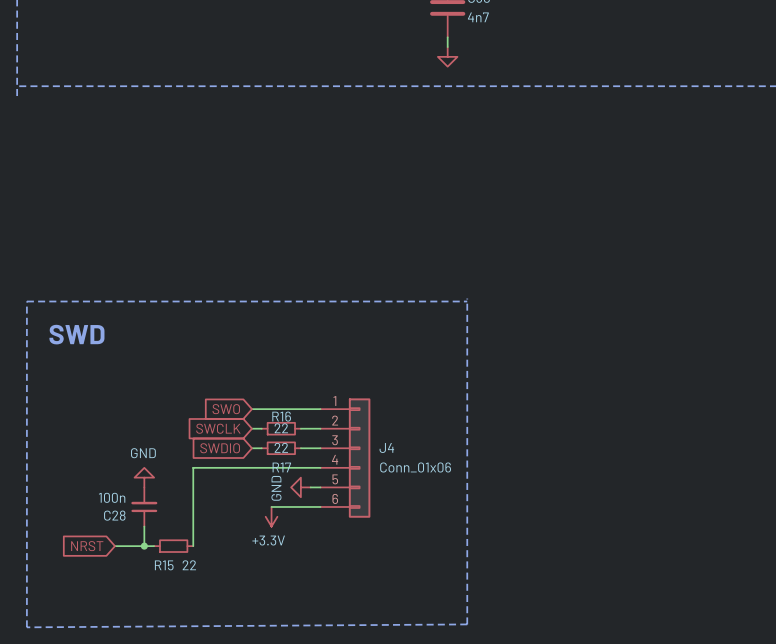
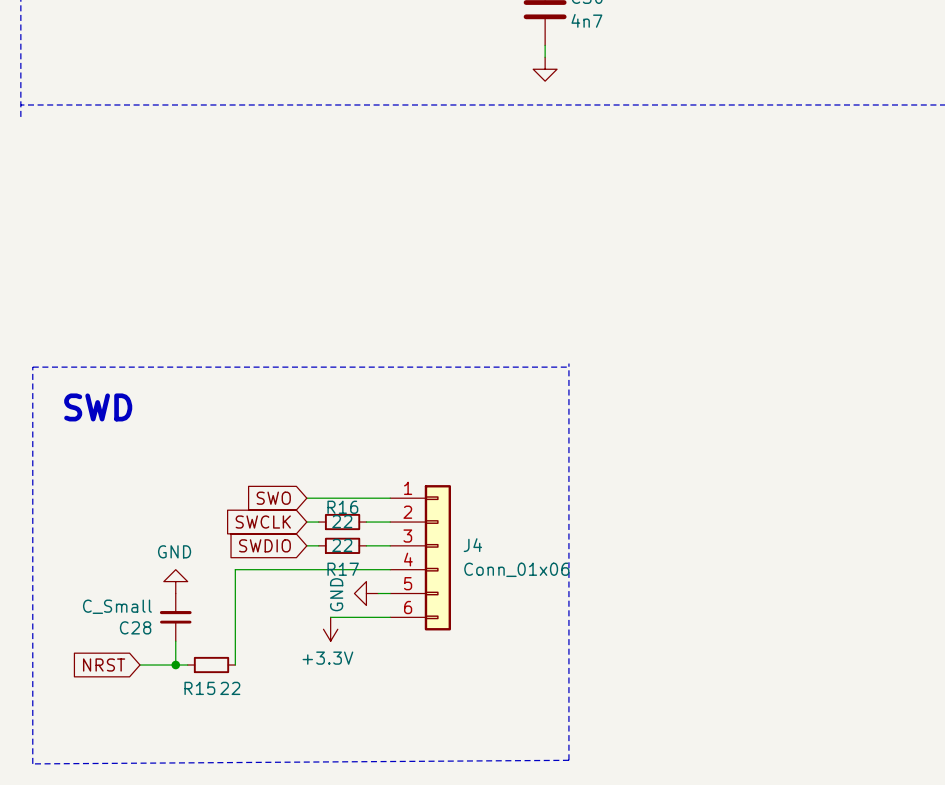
C28 value: 100n (112, 497) -> C_Small (117, 606)

